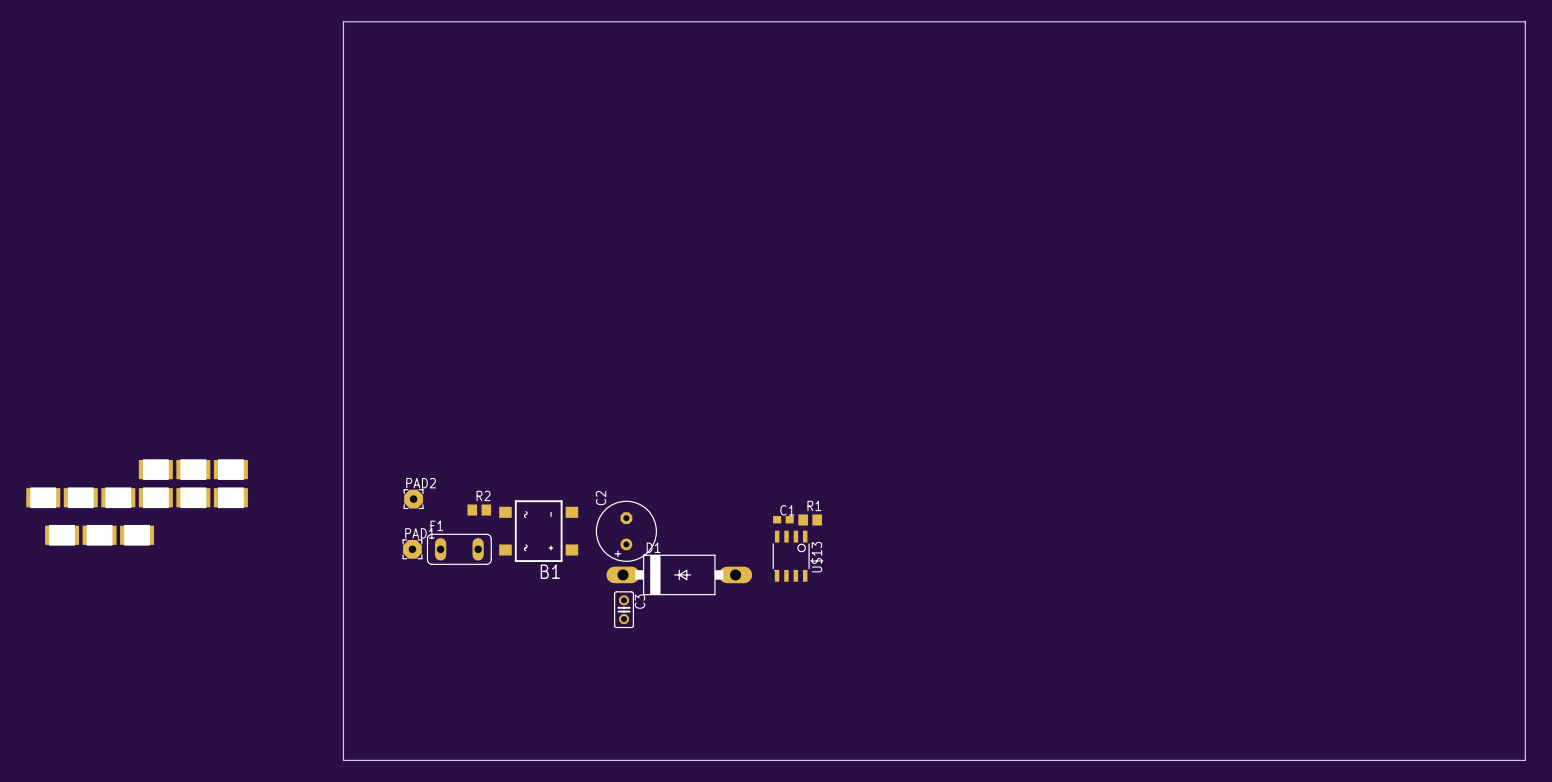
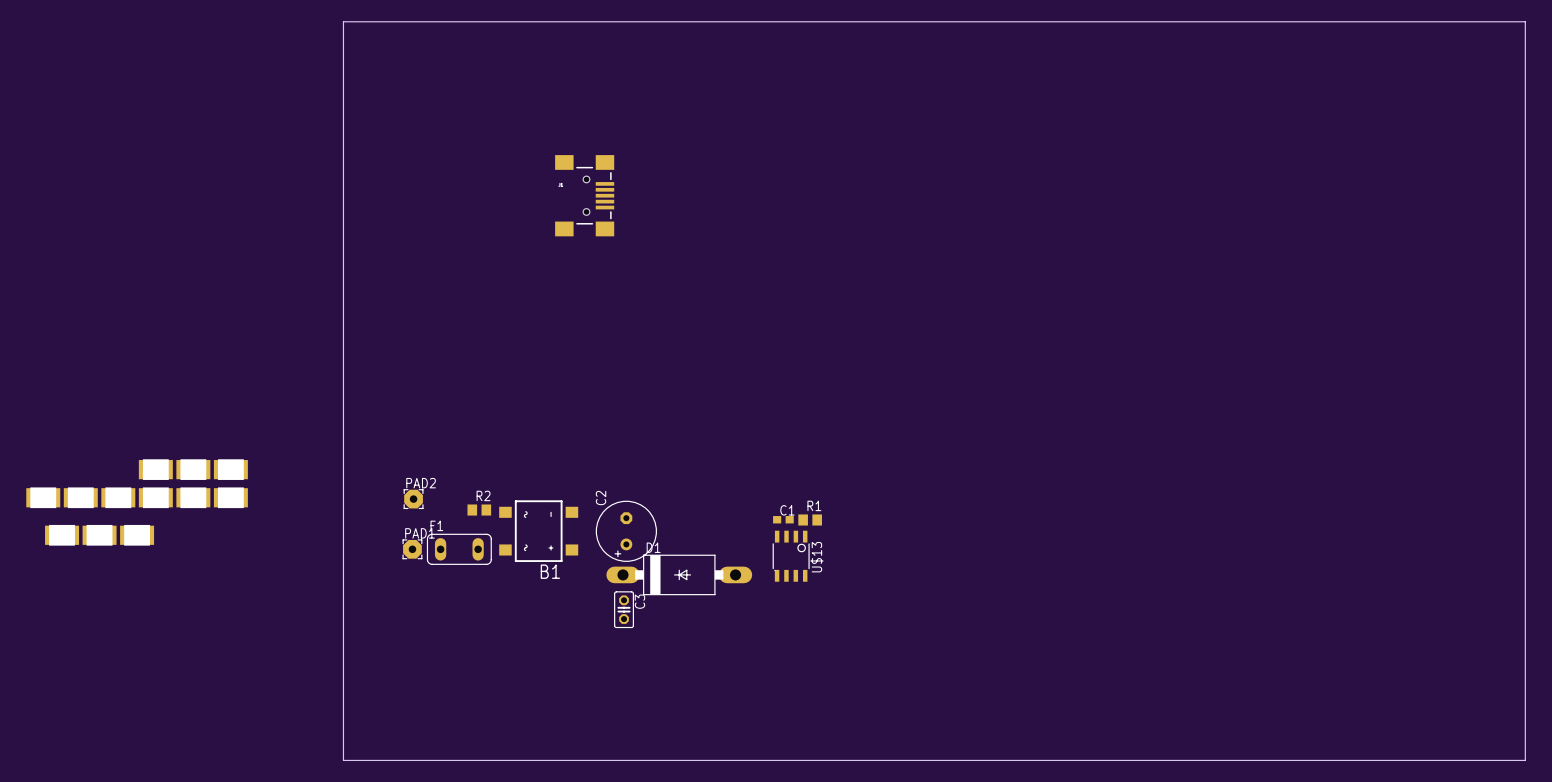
part: none -> (584, 195)

